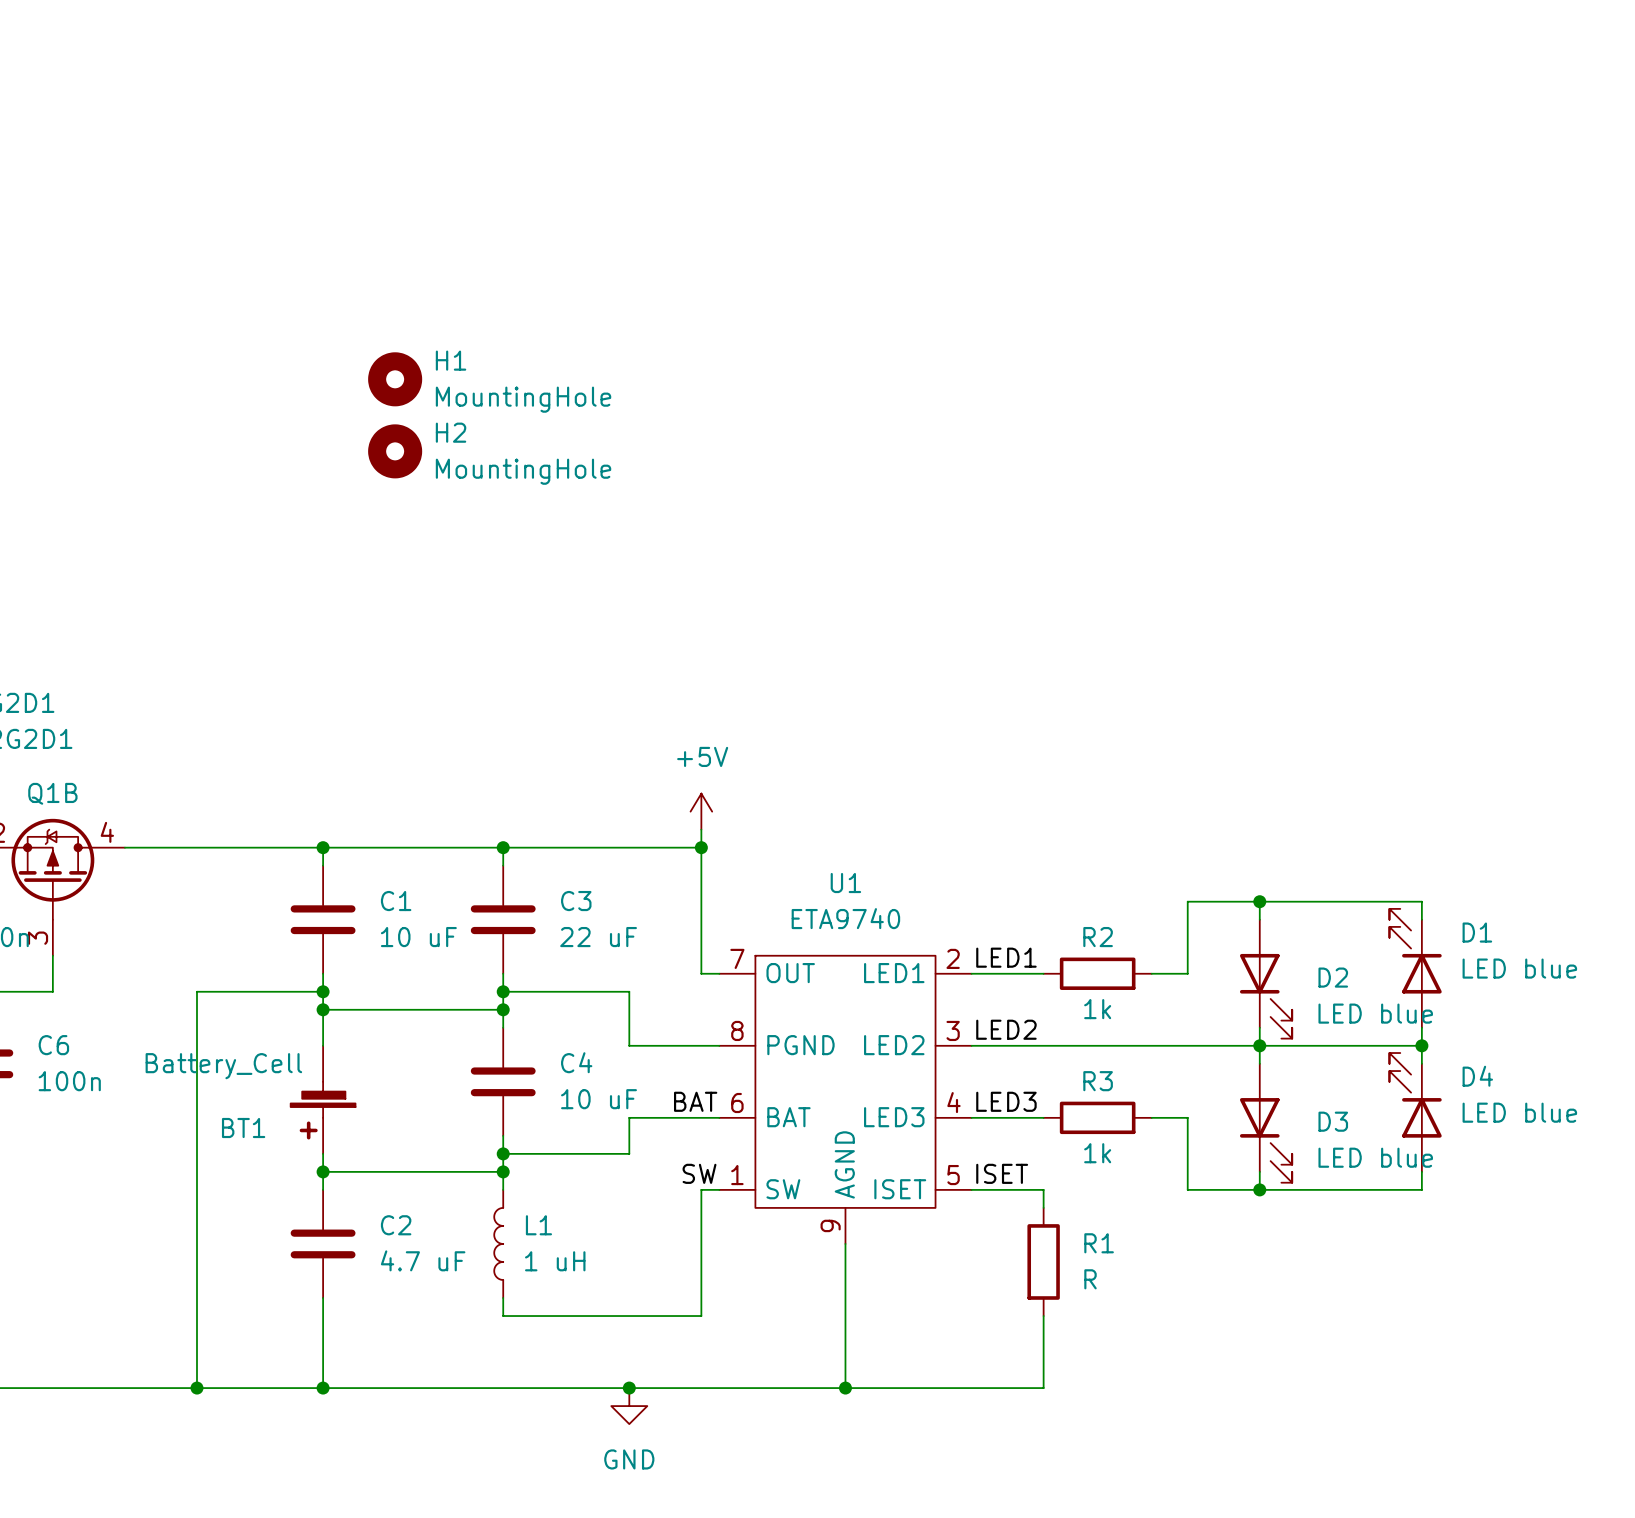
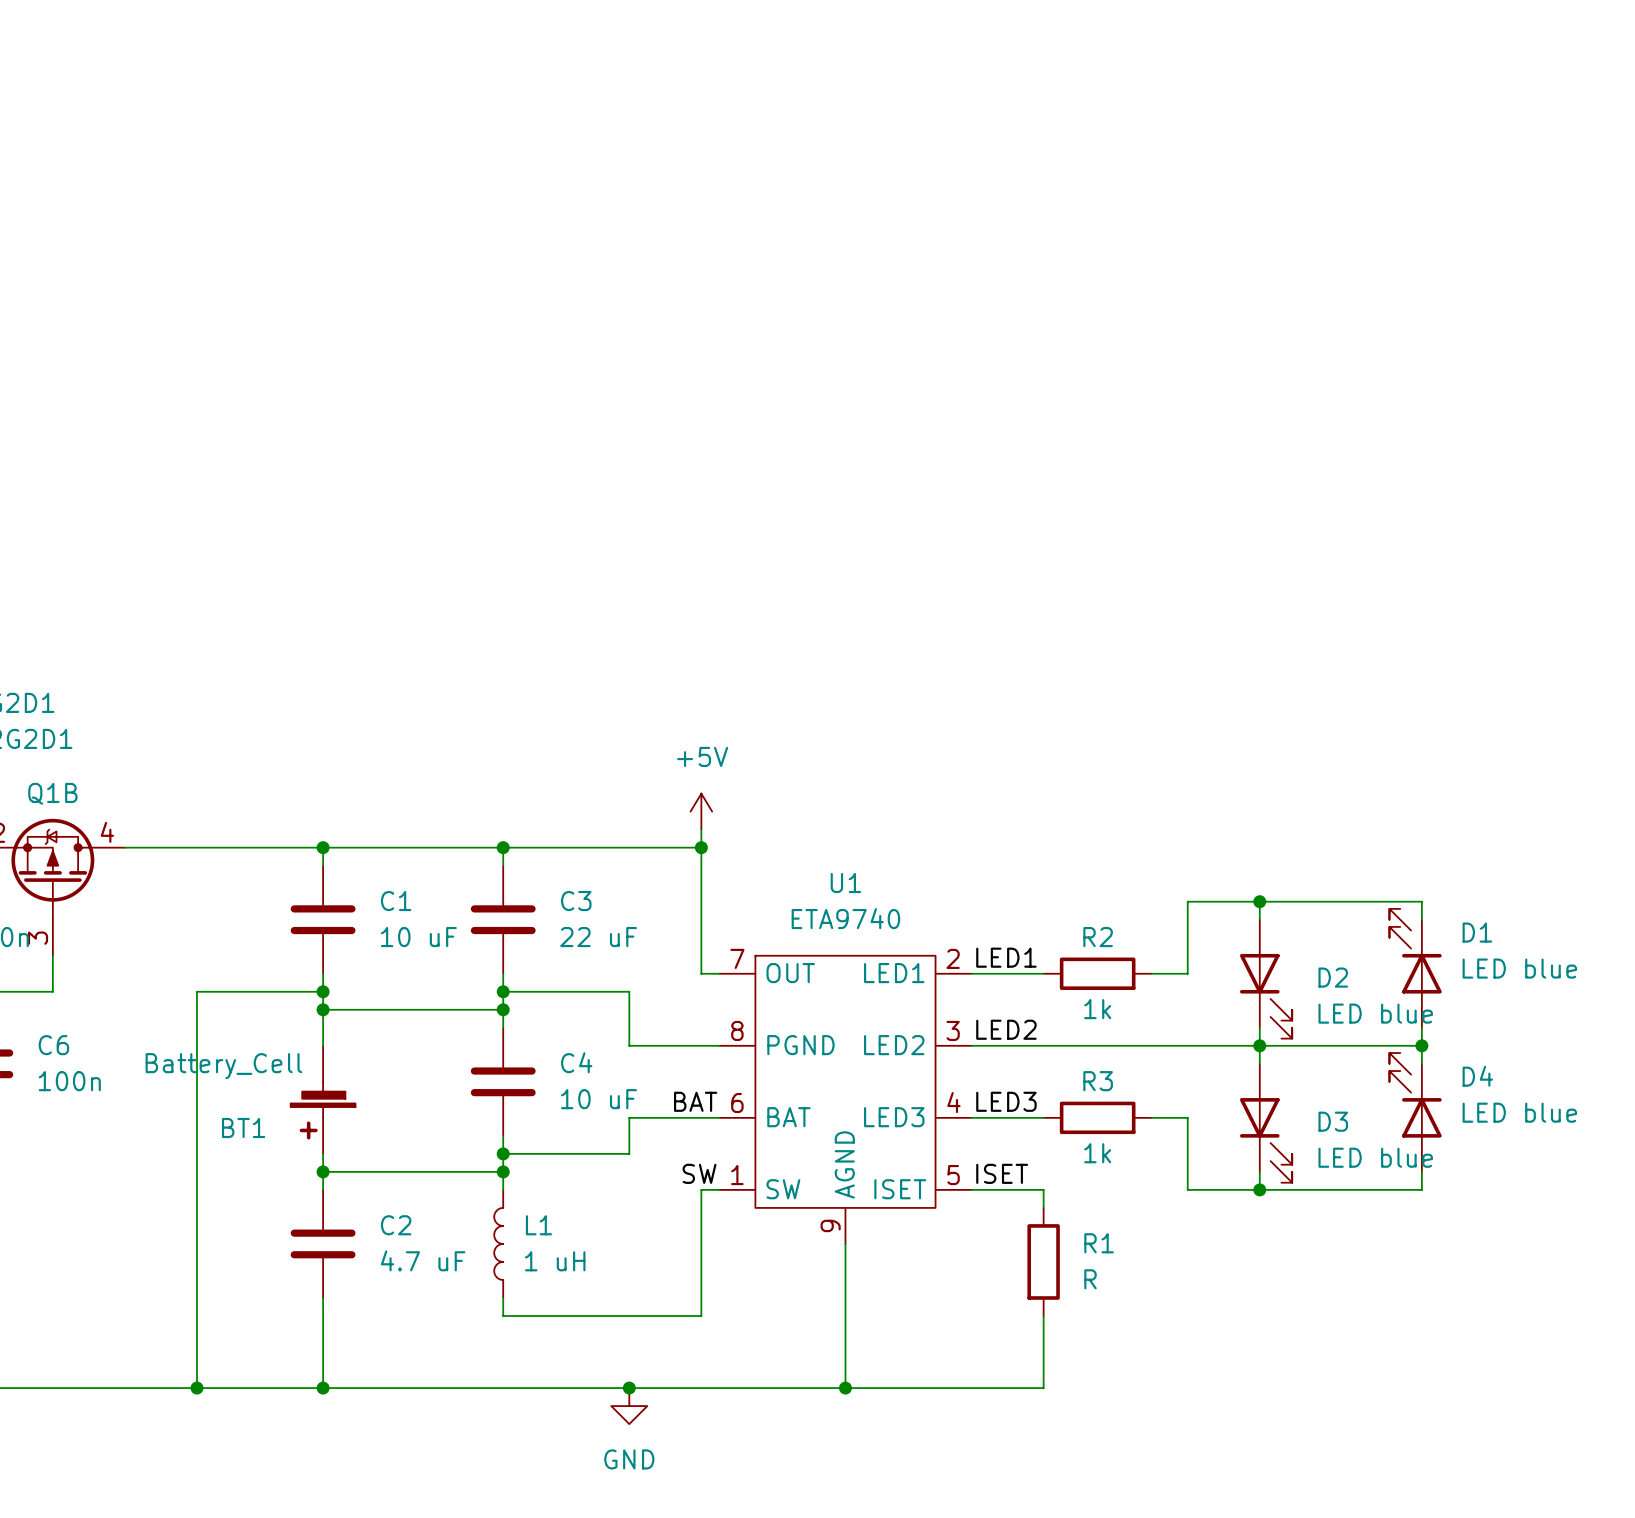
H1: MountingHole (395, 379) -> none
H2: MountingHole (395, 451) -> none

